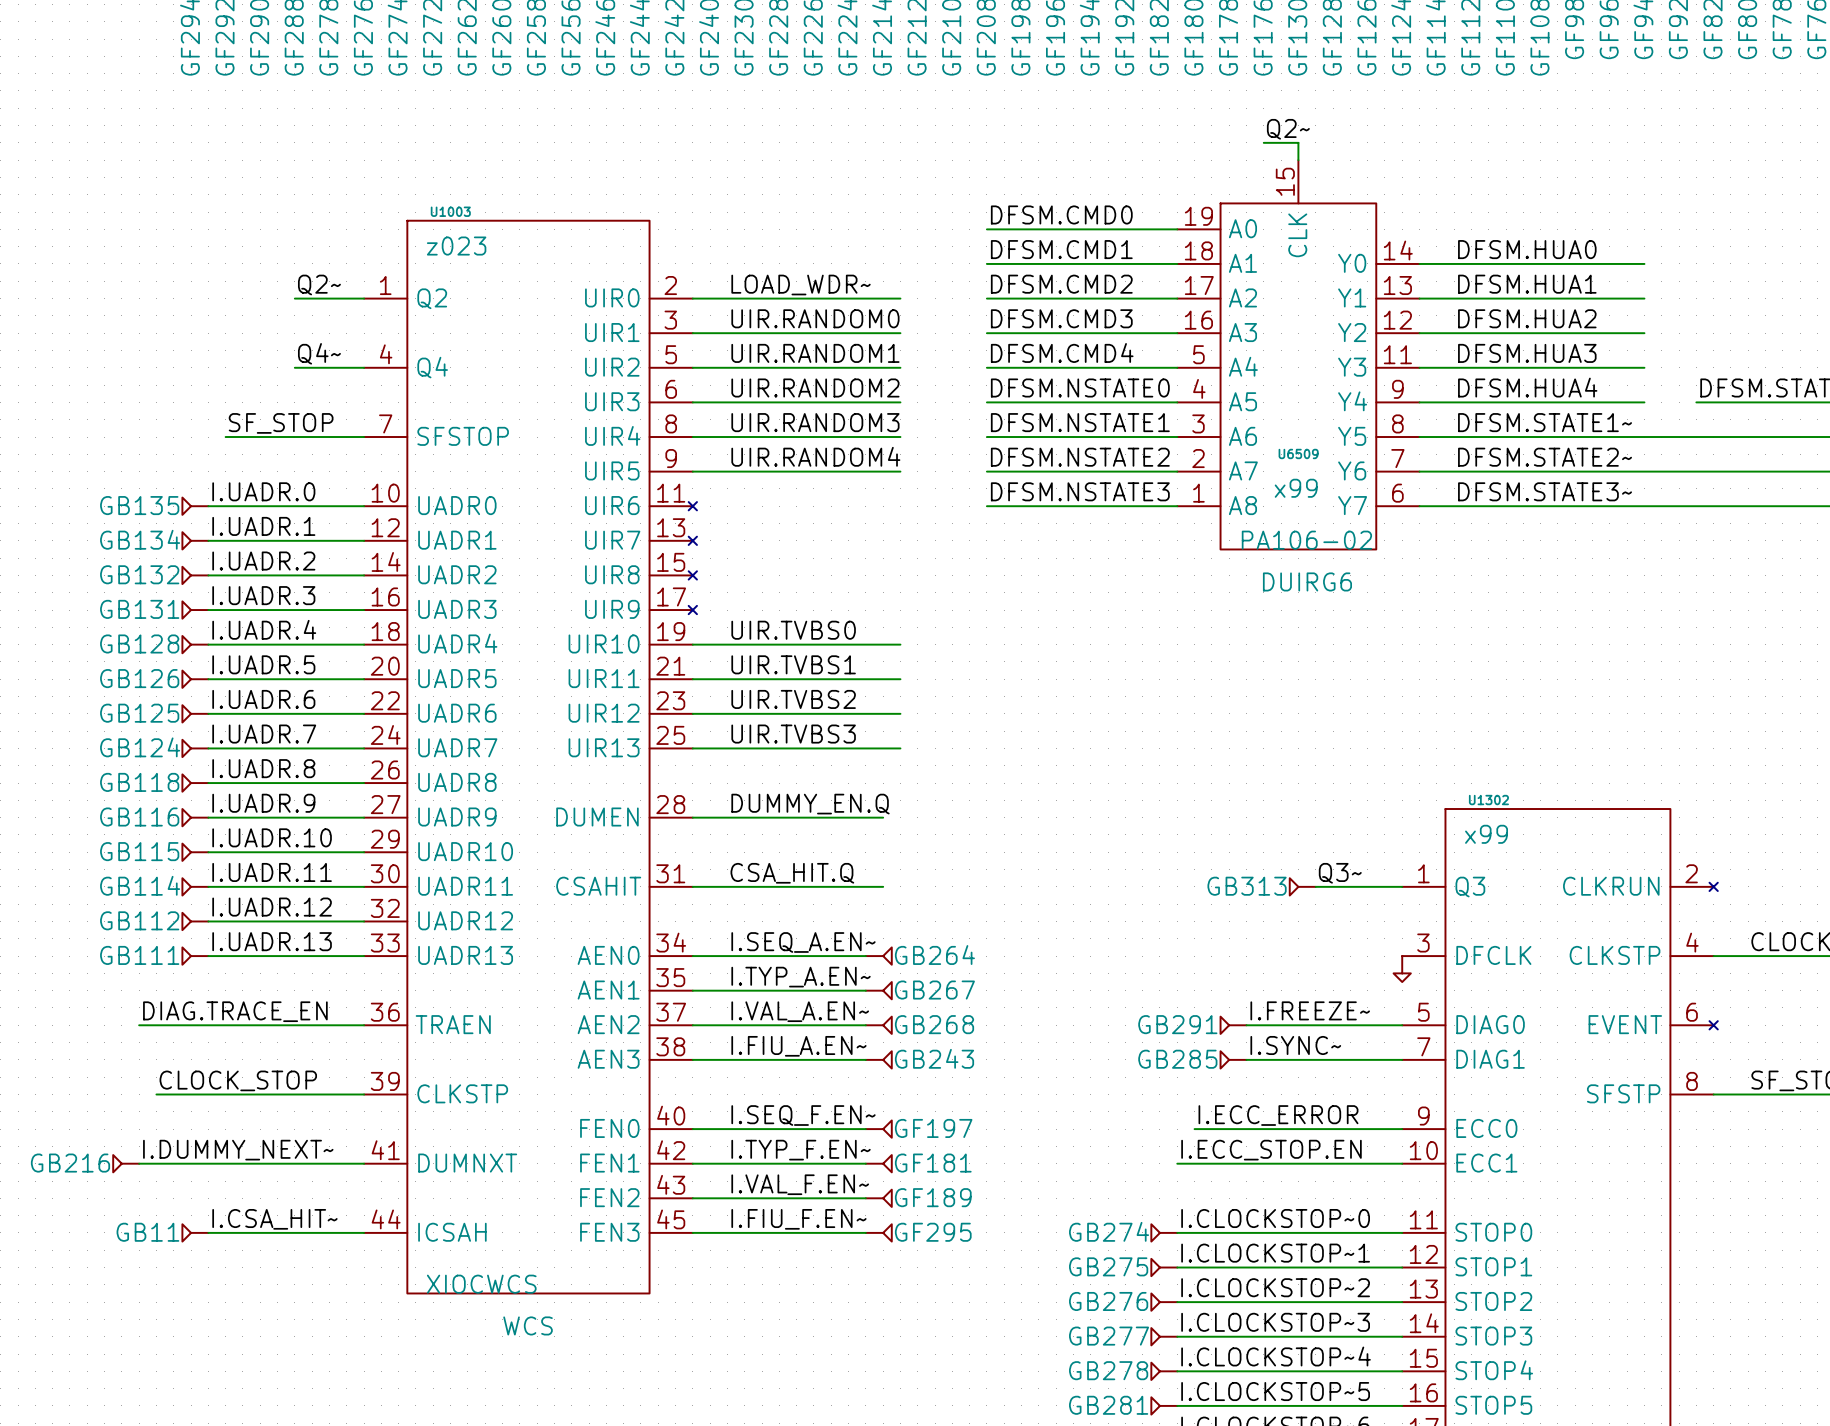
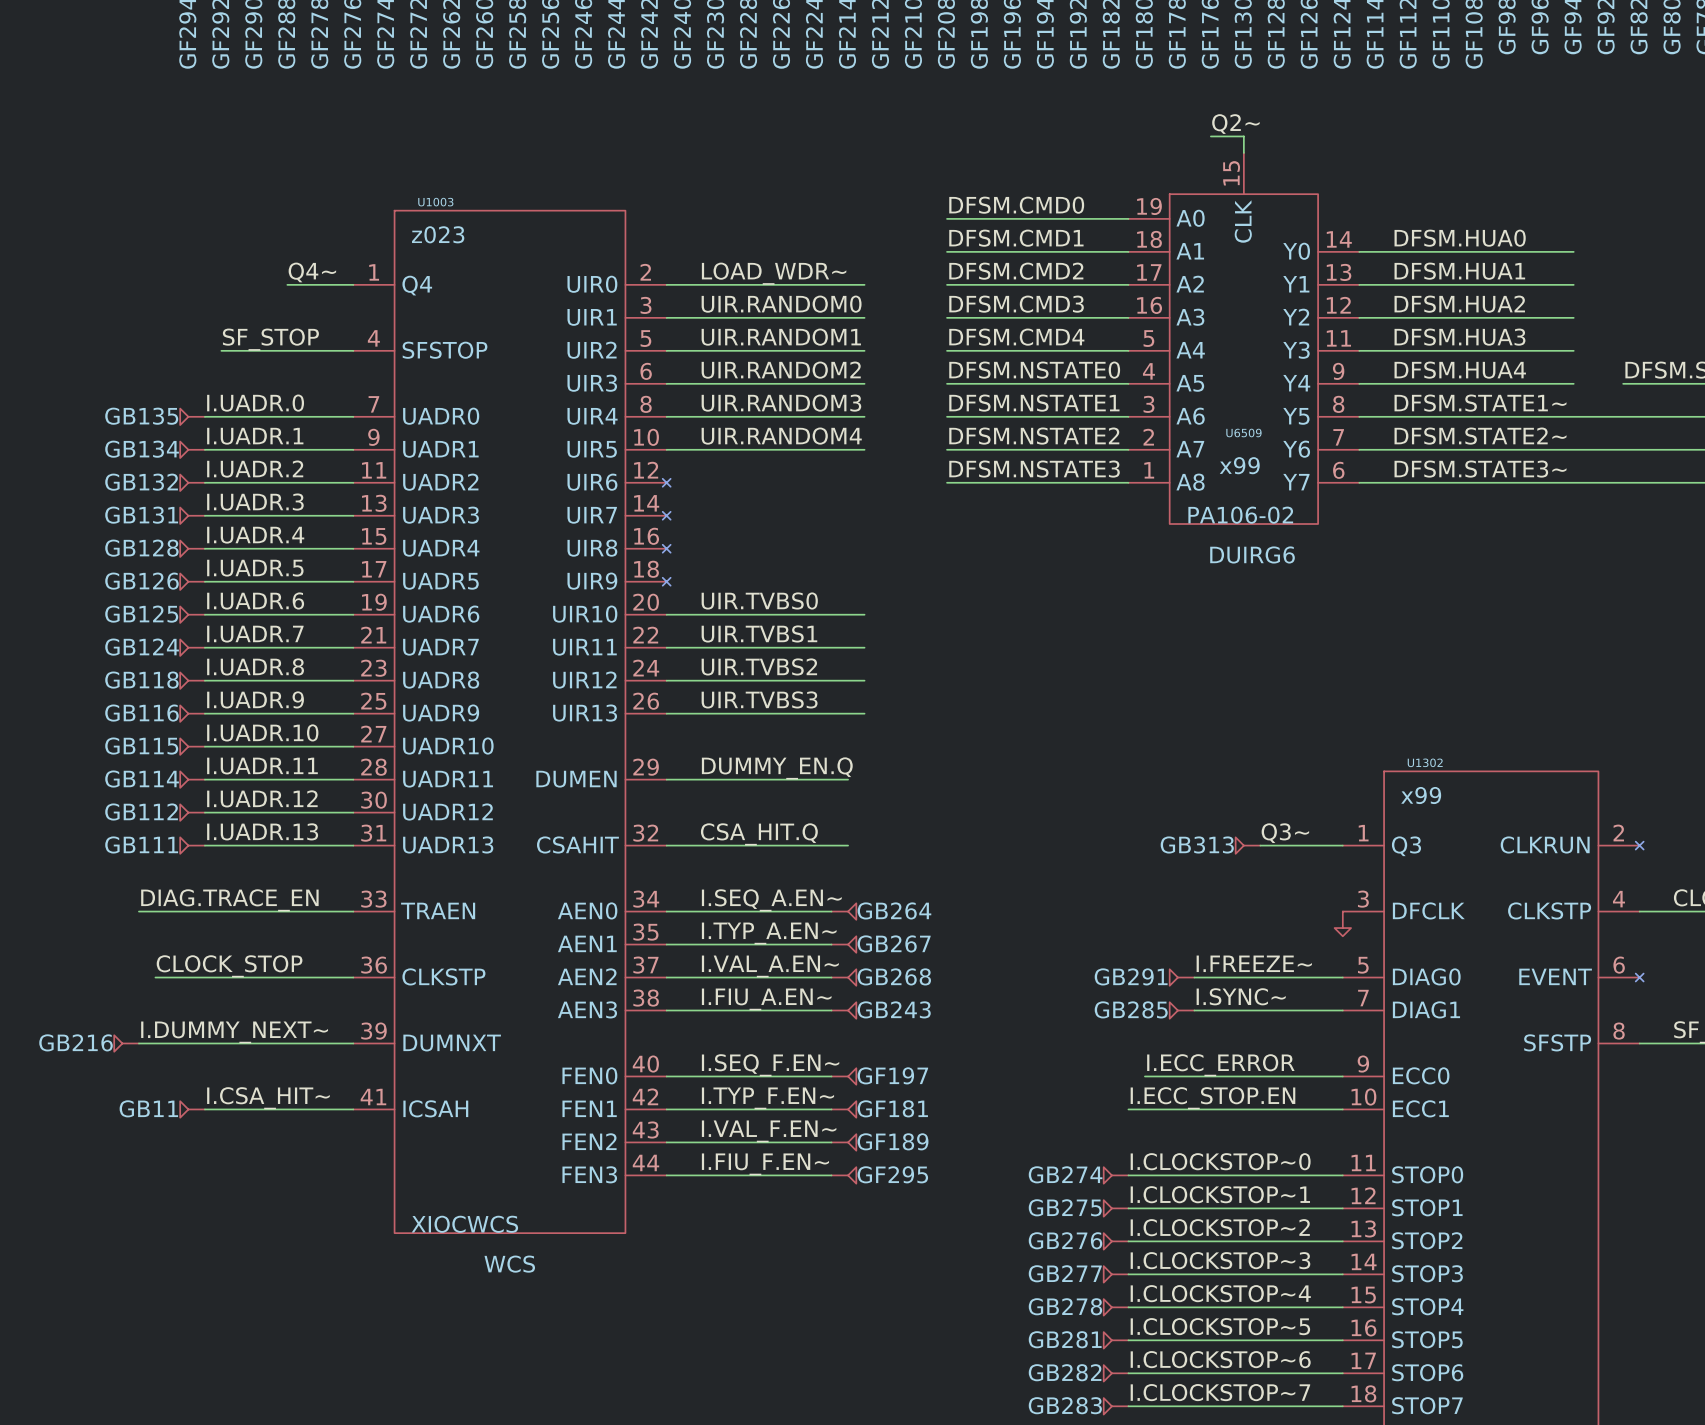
U1003 symbol: [364, 220, 693, 1294] -> [353, 210, 667, 1234]
label: Q2~ (319, 285) -> Q4~ (312, 272)
label: Q4~ (319, 353) -> none
wire: none -> (221, 350) (287, 350)
label: none -> I.UADR.0 (255, 403)
label position: SF_STOP (281, 423) -> SF_STOP (270, 339)
GB135: none -> (192, 416)
wire: none -> (204, 416) (221, 416)
label: none -> I.UADR.1 (255, 436)
GB134: none -> (192, 449)
wire: none -> (204, 449) (353, 449)
label: I.UADR.0 (263, 491) -> I.UADR.2 (255, 469)
GB135 name: GB135 (139, 505) -> GB132 (141, 482)
label: I.UADR.1 (263, 526) -> I.UADR.3 (255, 502)
GB134 name: GB134 (140, 539) -> GB131 (141, 515)
label: I.UADR.2 (263, 561) -> I.UADR.4 (255, 535)
GB132 name: GB132 (139, 574) -> GB128 (141, 548)
label: I.UADR.3 (263, 595) -> I.UADR.5 (255, 568)
GB131 name: GB131 (139, 609) -> GB126 (141, 581)
label: I.UADR.4 (264, 629) -> I.UADR.6 (255, 600)
GB128 name: GB128 (139, 643) -> GB125 (141, 614)
label: I.UADR.5 (263, 664) -> I.UADR.7 (255, 634)
GB126 name: GB126 (139, 678) -> GB124 (142, 647)
label: I.UADR.6 (263, 699) -> I.UADR.8 (255, 666)
GB125 name: GB125 (139, 713) -> GB118 (141, 680)
label: I.UADR.7 (264, 734) -> I.UADR.9 (255, 699)
GB124 name: GB124 (140, 747) -> GB116 (141, 713)
label: I.UADR.8 (263, 768) -> I.UADR.10 (262, 732)
GB118 name: GB118 (139, 782) -> GB115 (141, 746)
label: I.UADR.9 (263, 803) -> I.UADR.11 (262, 766)
GB116 name: GB116 (139, 817) -> GB114 (142, 779)
label: I.UADR.10 (272, 837) -> I.UADR.12 (262, 798)
GB115 name: GB115 (139, 851) -> GB112 (141, 812)
label: I.UADR.11 (272, 872) -> I.UADR.13 (262, 831)
GB114 name: GB114 (140, 885) -> GB111 (141, 844)
label: I.UADR.12 (272, 907) -> none
GB112: (195, 921) -> none
wire: (208, 921) (364, 921) -> none
label: I.UADR.13 (272, 941) -> none
wire: none -> (138, 911) (204, 911)
GB111: (195, 956) -> none
label position: DIAG.TRACE_EN (235, 1011) -> DIAG.TRACE_EN (229, 900)
wire: (139, 1025) (156, 1025) -> (138, 1043) (155, 1043)
label position: CLOCK_STOP (238, 1080) -> CLOCK_STOP (229, 966)
label position: I.DUMMY_NEXT~ (238, 1150) -> I.DUMMY_NEXT~ (234, 1032)
GB216 position: (125, 1163) -> (126, 1043)
wire: (139, 1163) (208, 1163) -> none
label position: I.CSA_HIT~ (274, 1219) -> I.CSA_HIT~ (268, 1098)
GB11 position: (195, 1232) -> (192, 1109)
wire: (208, 1232) (364, 1232) -> none

